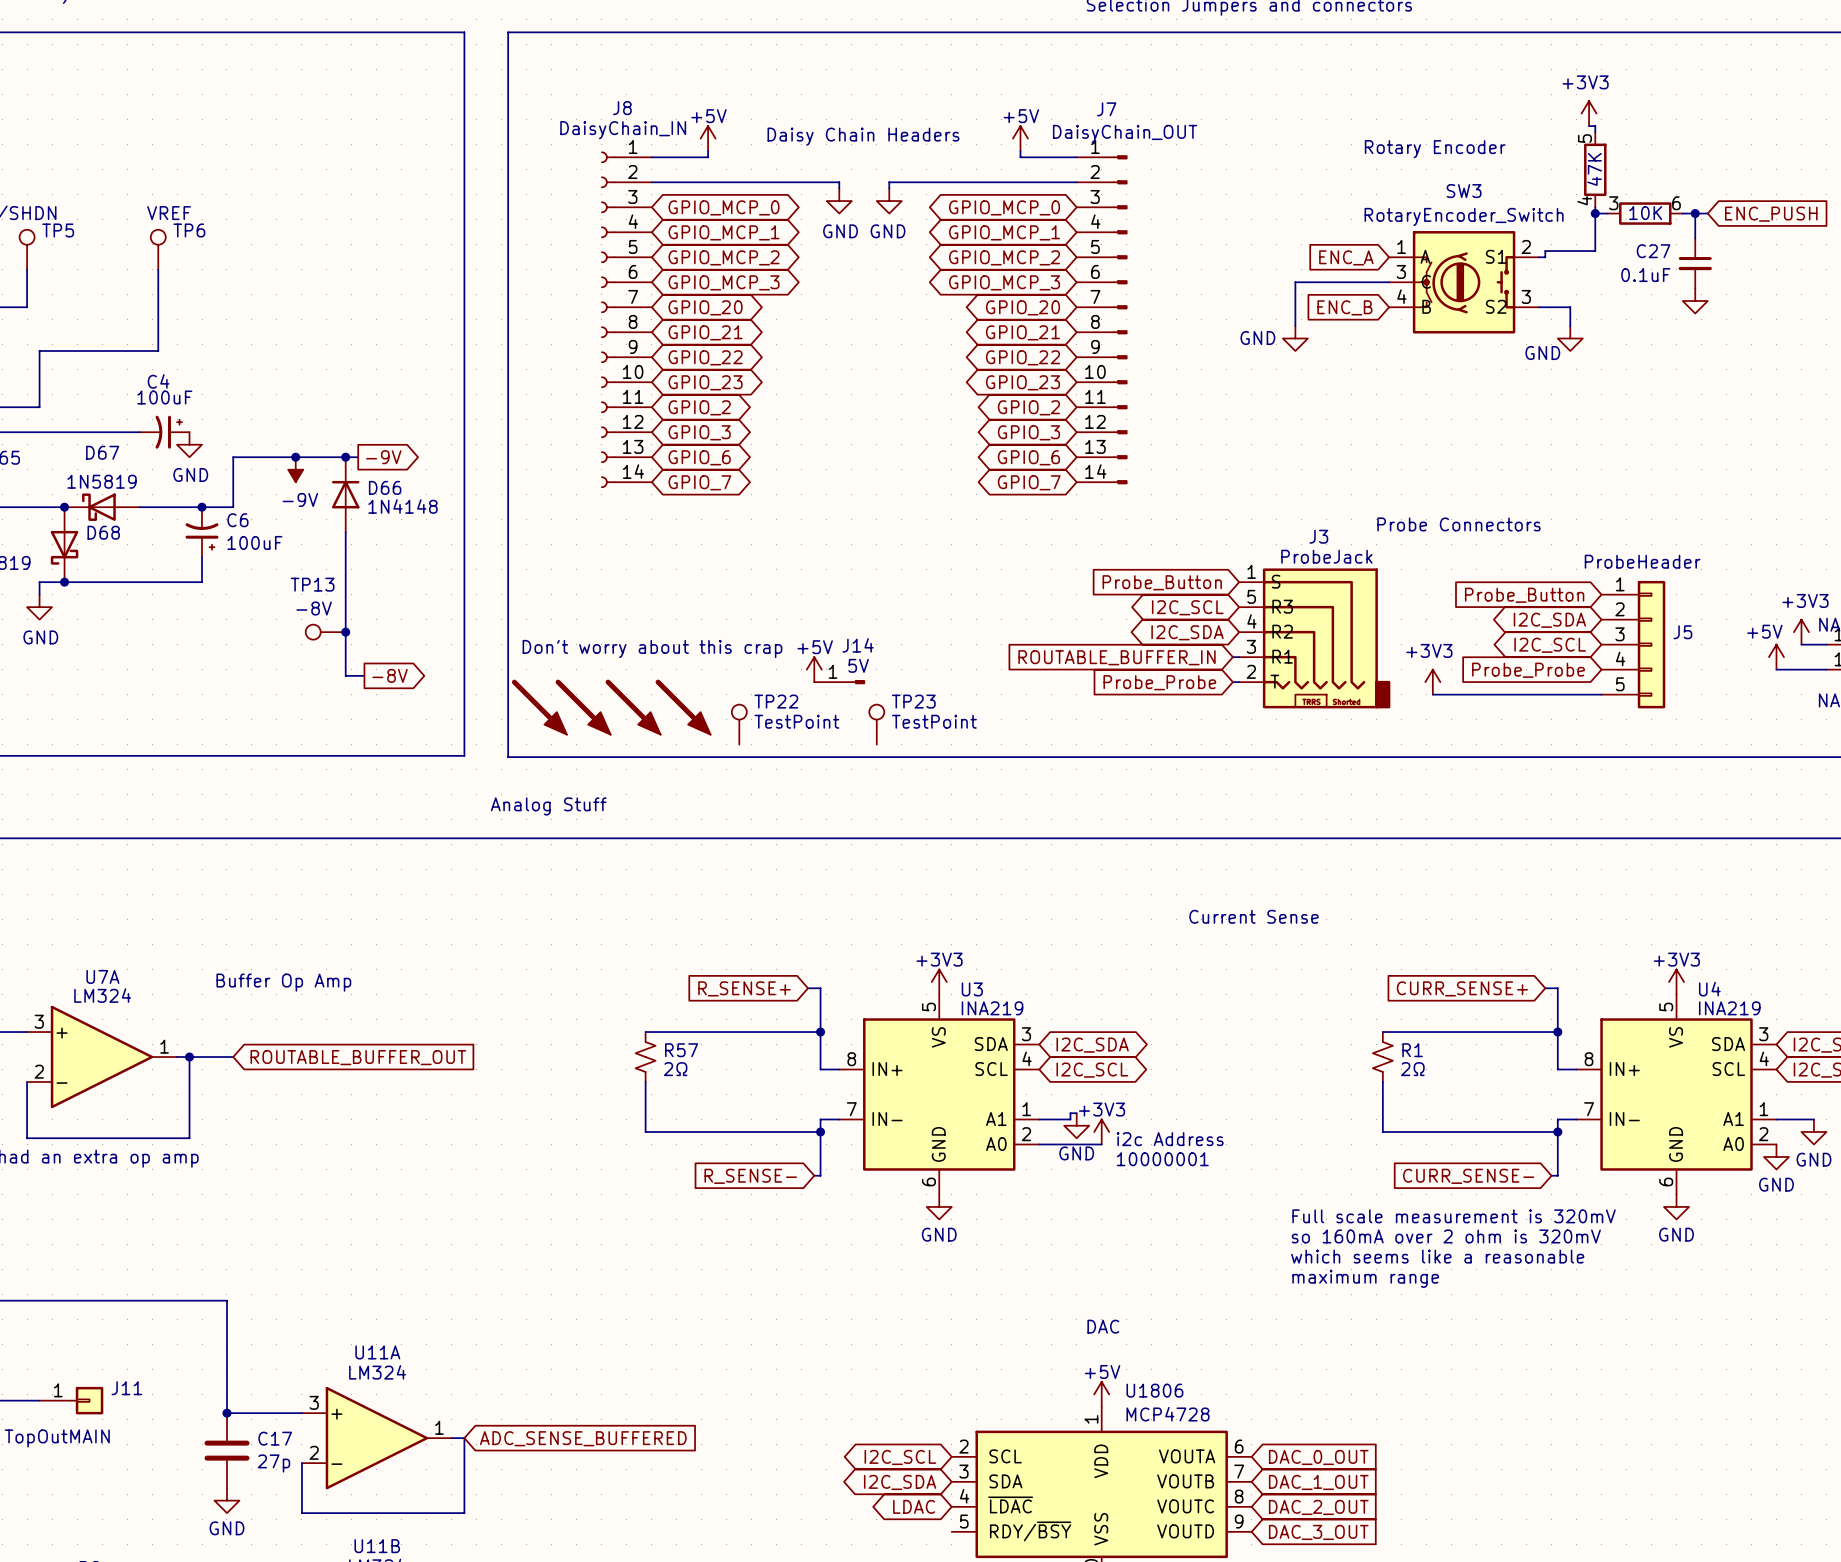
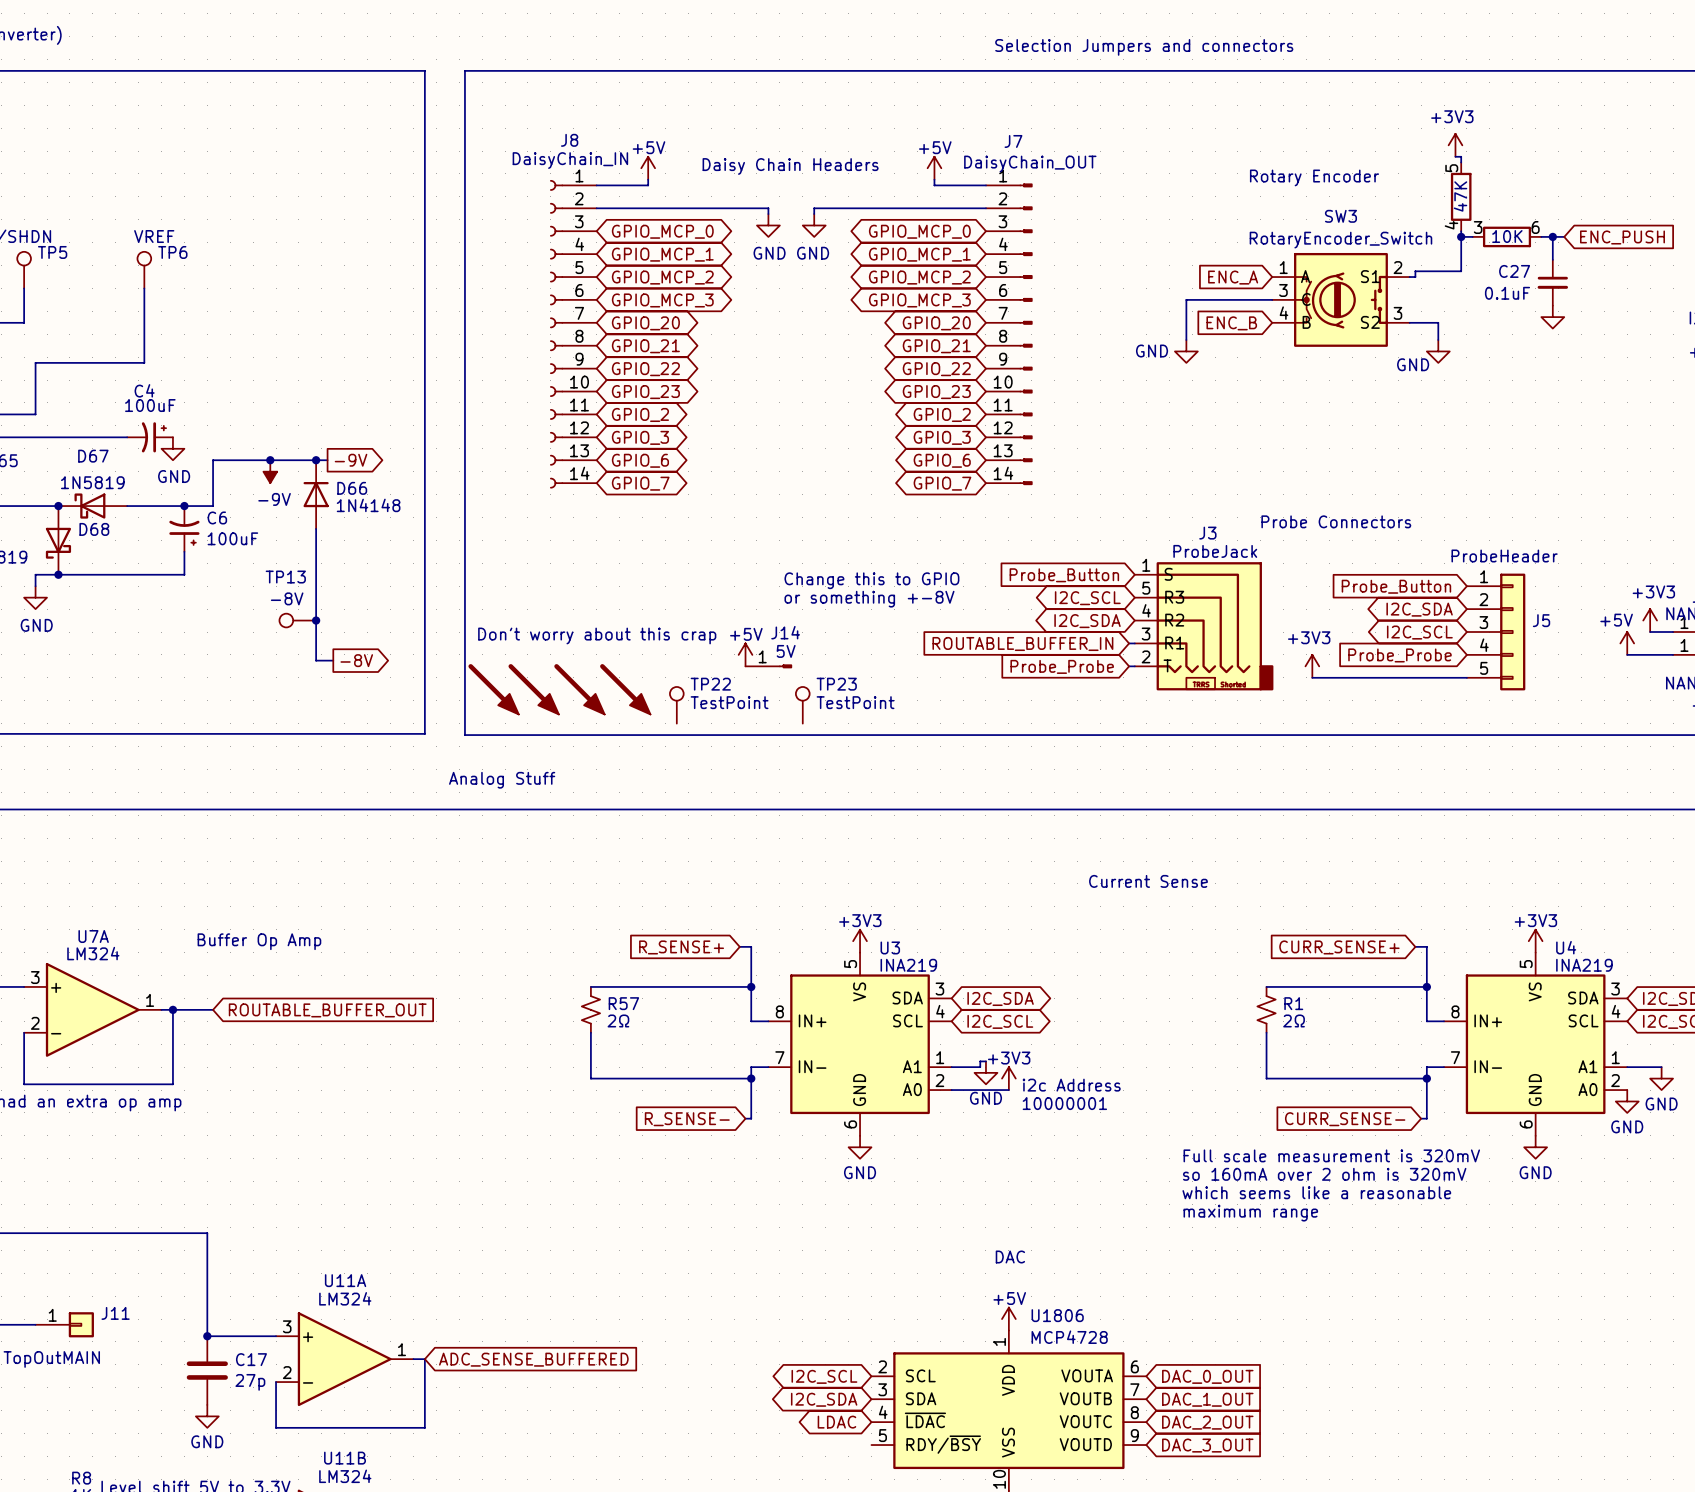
text: none -> Change this to GPIO (871, 580)
text: none -> or something +-8V (869, 599)

